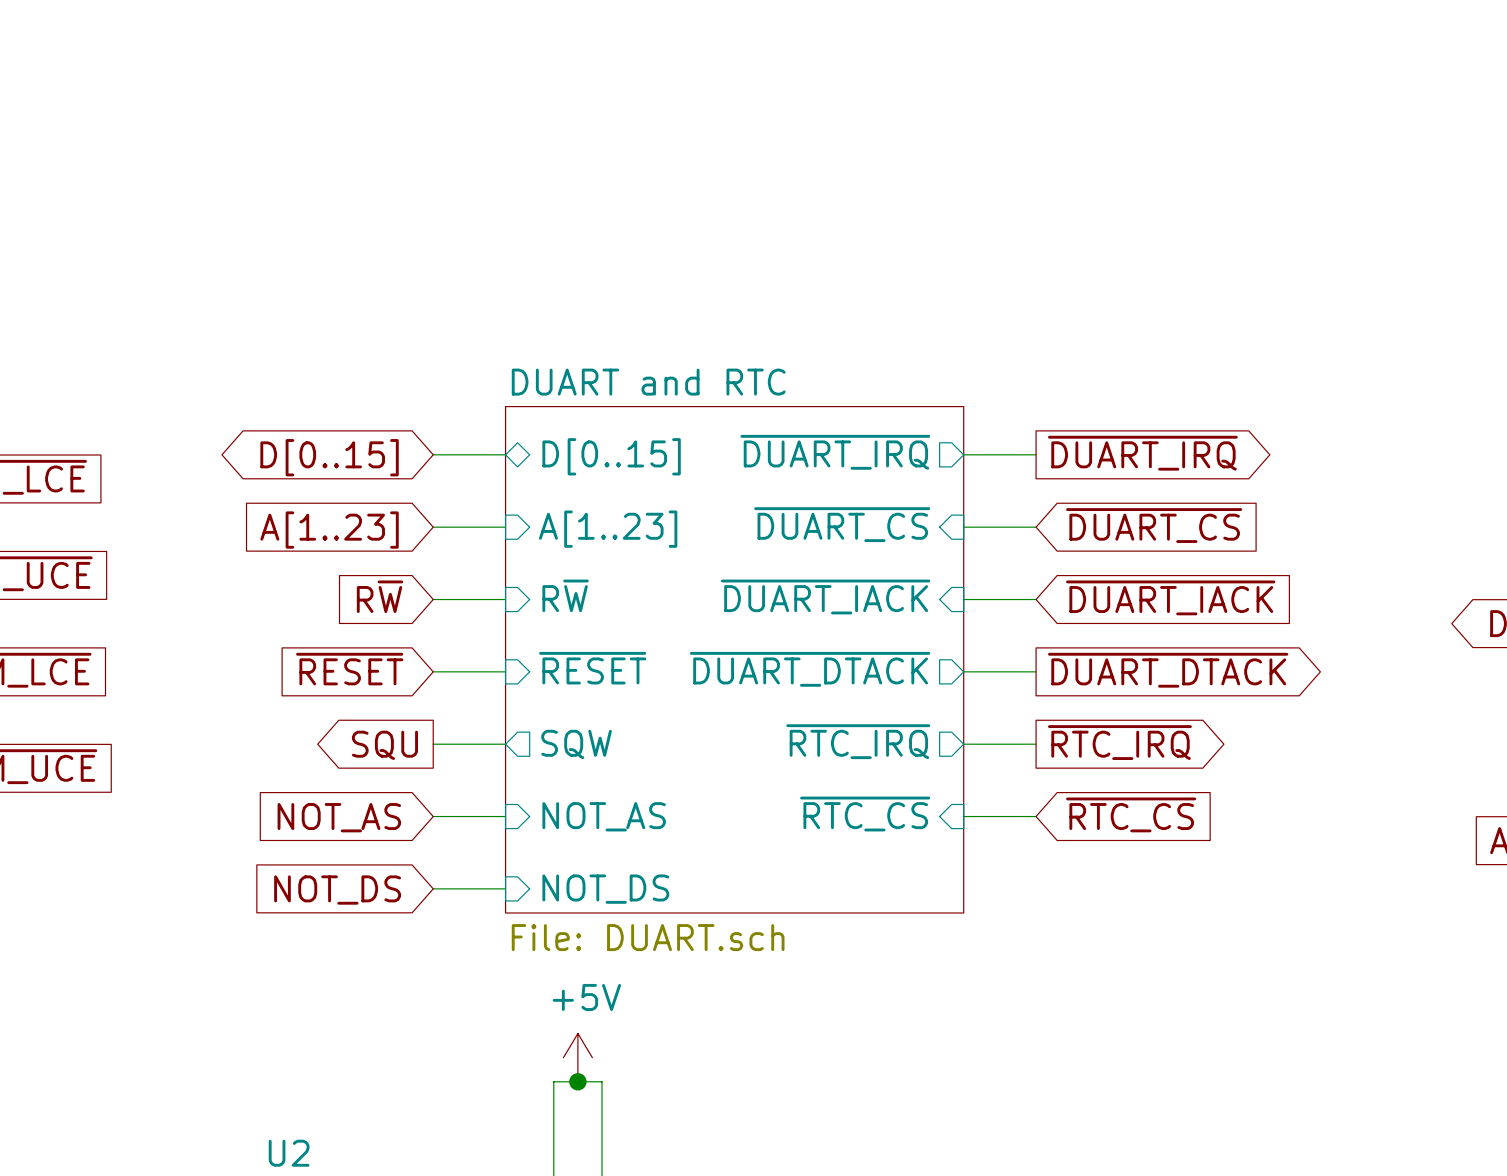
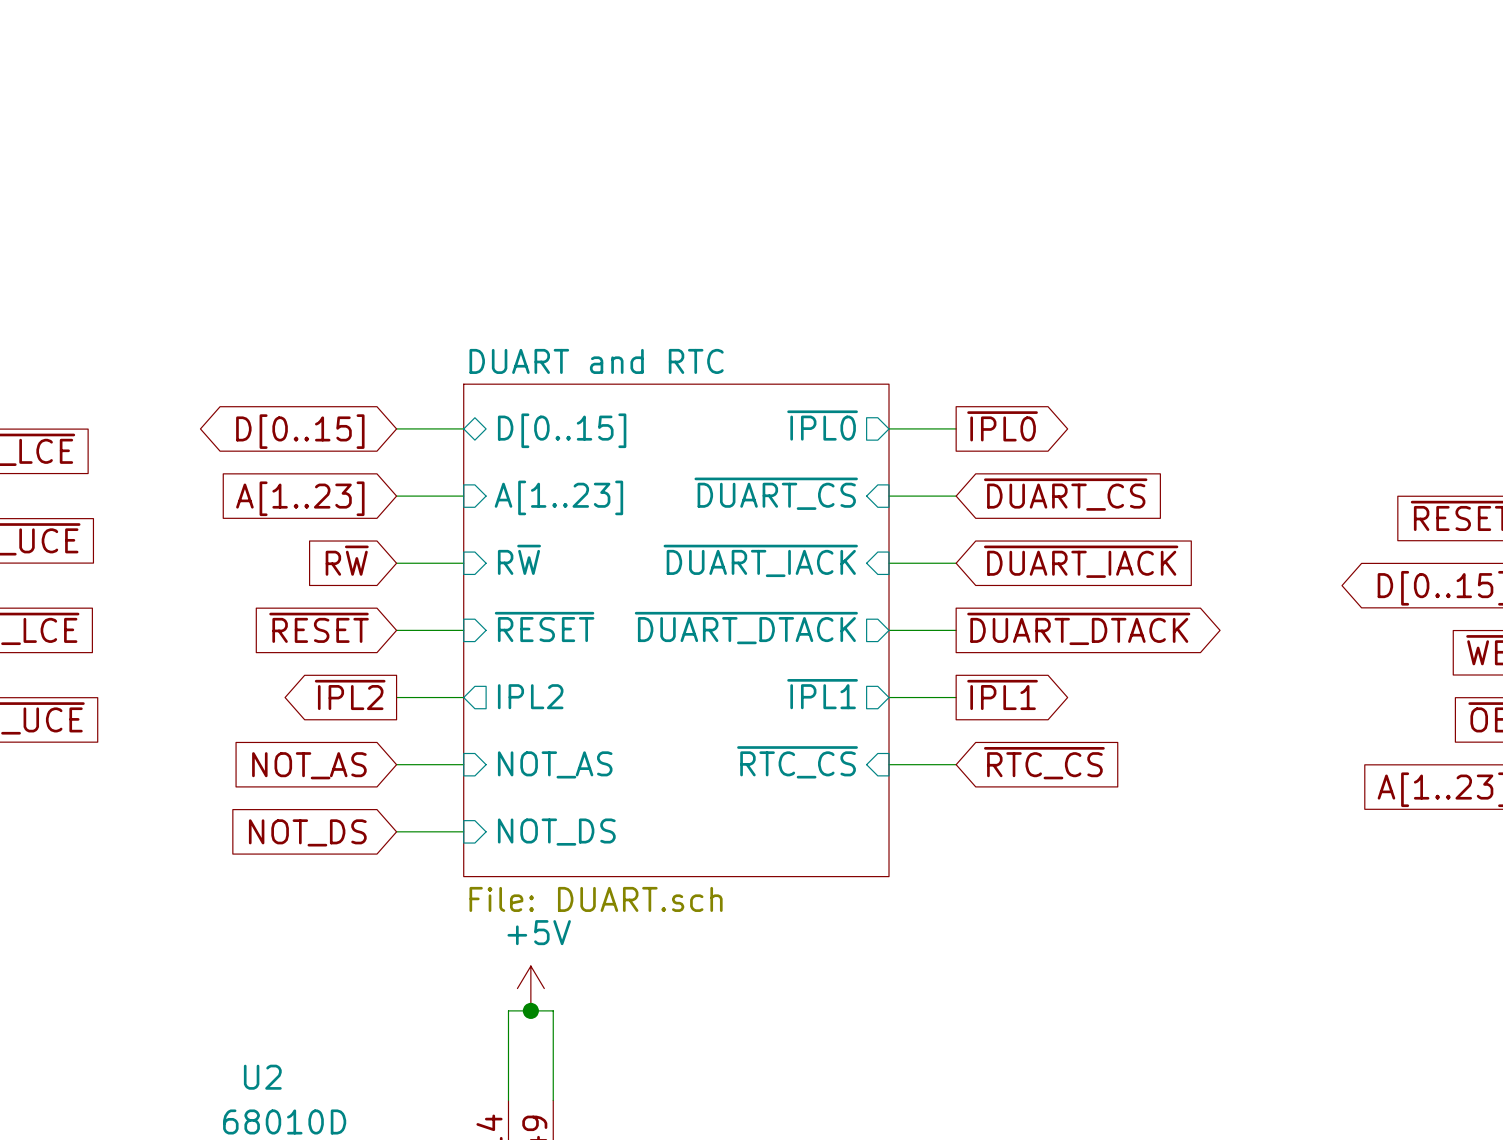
sheet DUART and RTC shape: [505, 406, 964, 913] -> [463, 384, 890, 877]
sheet pin: ~{DUART_IRQ} (835, 452) -> ~{IPL0} (822, 425)
global label: ~{DUART_IRQ} (1142, 453) -> ~{IPL0} (1002, 426)
sheet pin: ~{RTC_IRQ} (858, 741) -> ~{IPL1} (822, 694)
global label: ~{RTC_IRQ} (1119, 742) -> ~{IPL1} (1002, 694)
sheet pin: SQW (576, 744) -> IPL2 (530, 696)
global label: SQU (384, 745) -> ~{IPL2} (350, 694)

